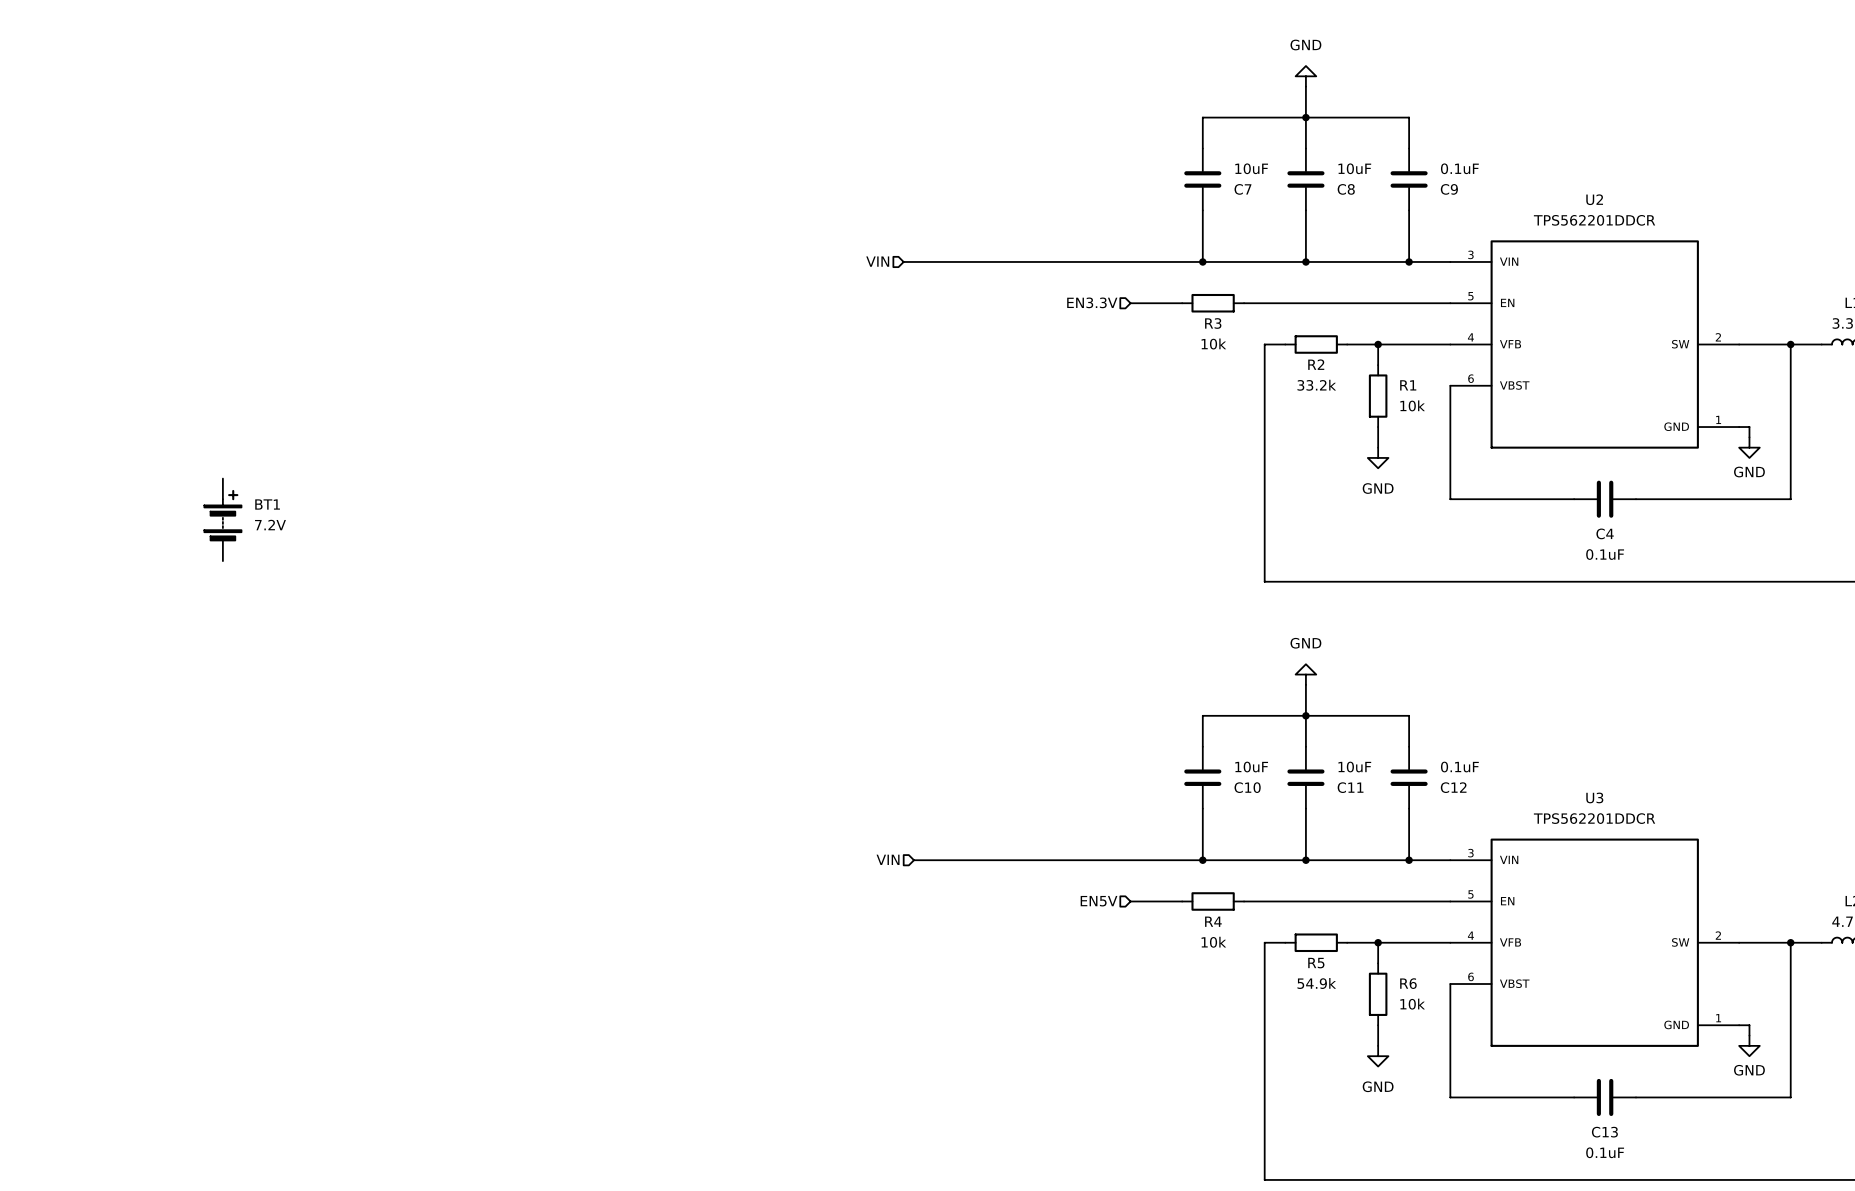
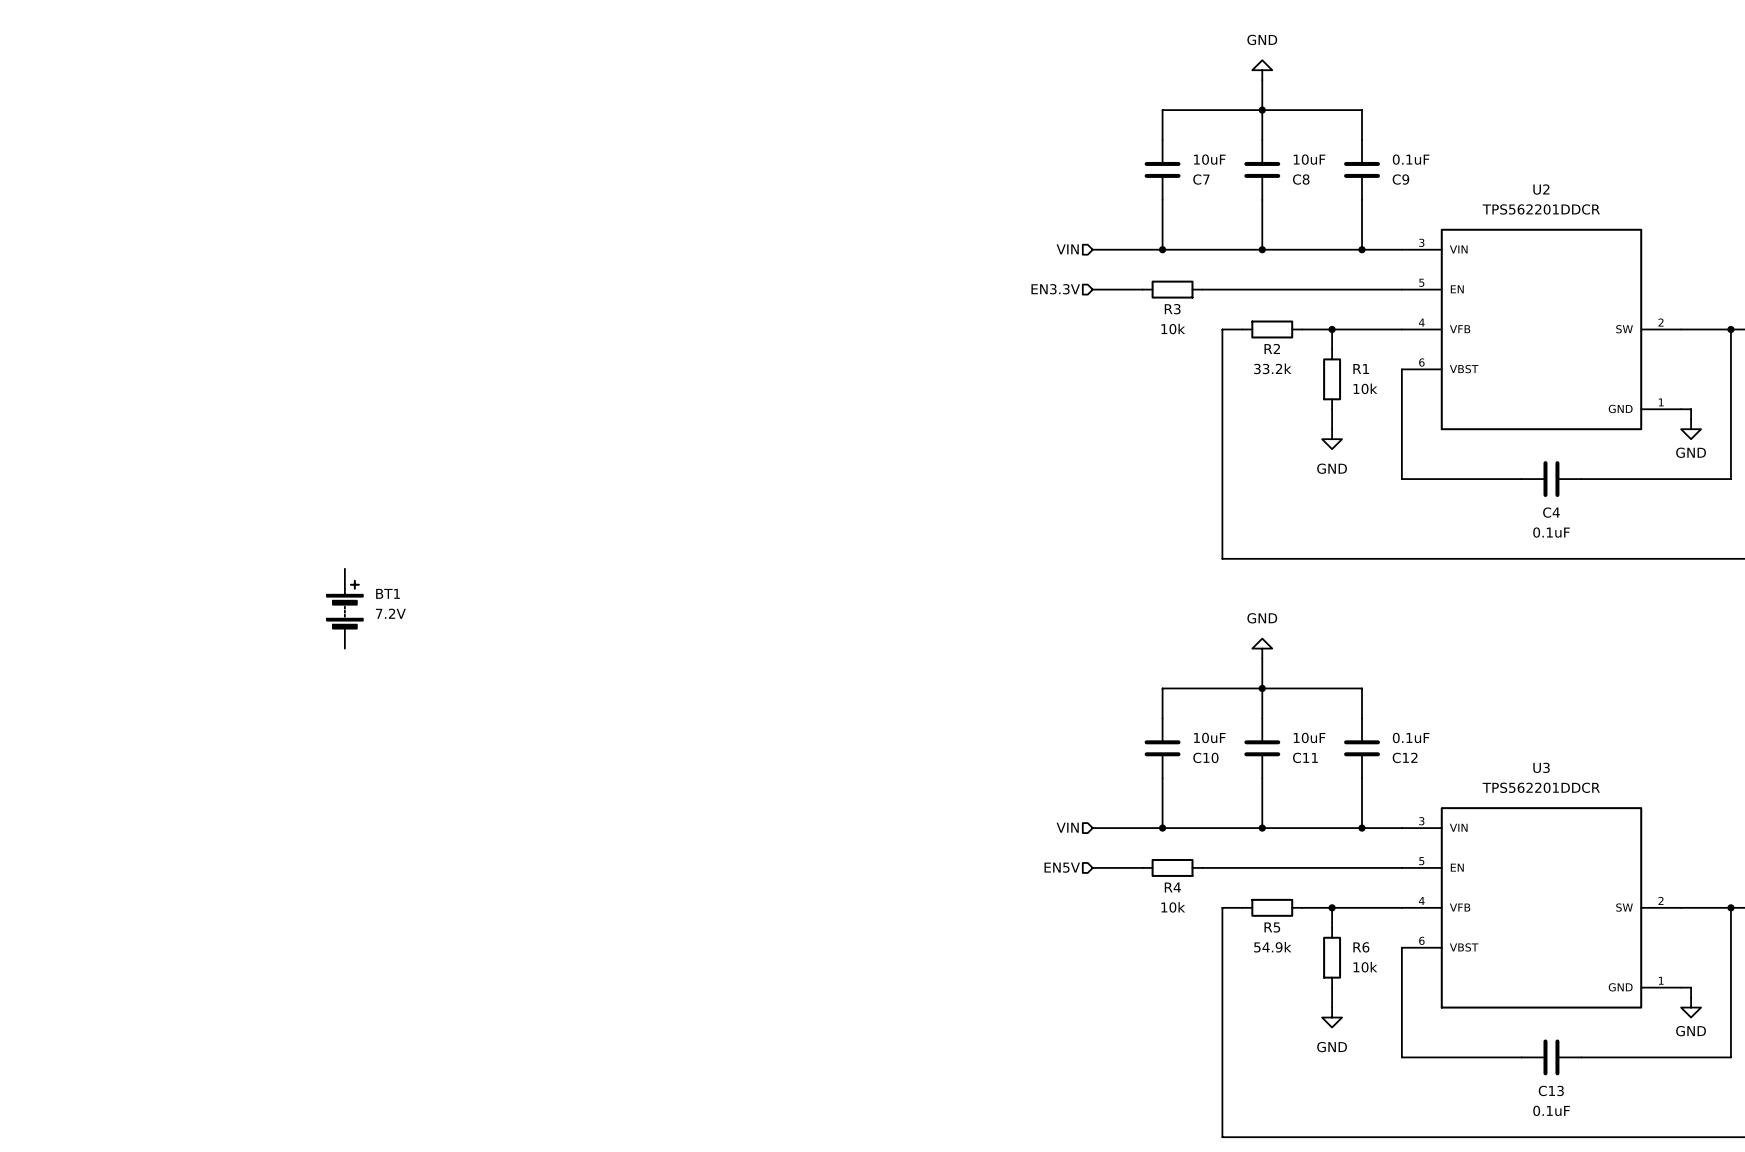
hierarchical label: VIN (877, 261) -> none
wire: (903, 261) (1130, 261) -> none
hierarchical label: none -> VIN (1067, 249)
BT1 position: (222, 519) -> (344, 608)
hierarchical label: VIN (888, 859) -> none
hierarchical label: none -> VIN (1067, 827)
wire: (913, 860) (1130, 860) -> none

